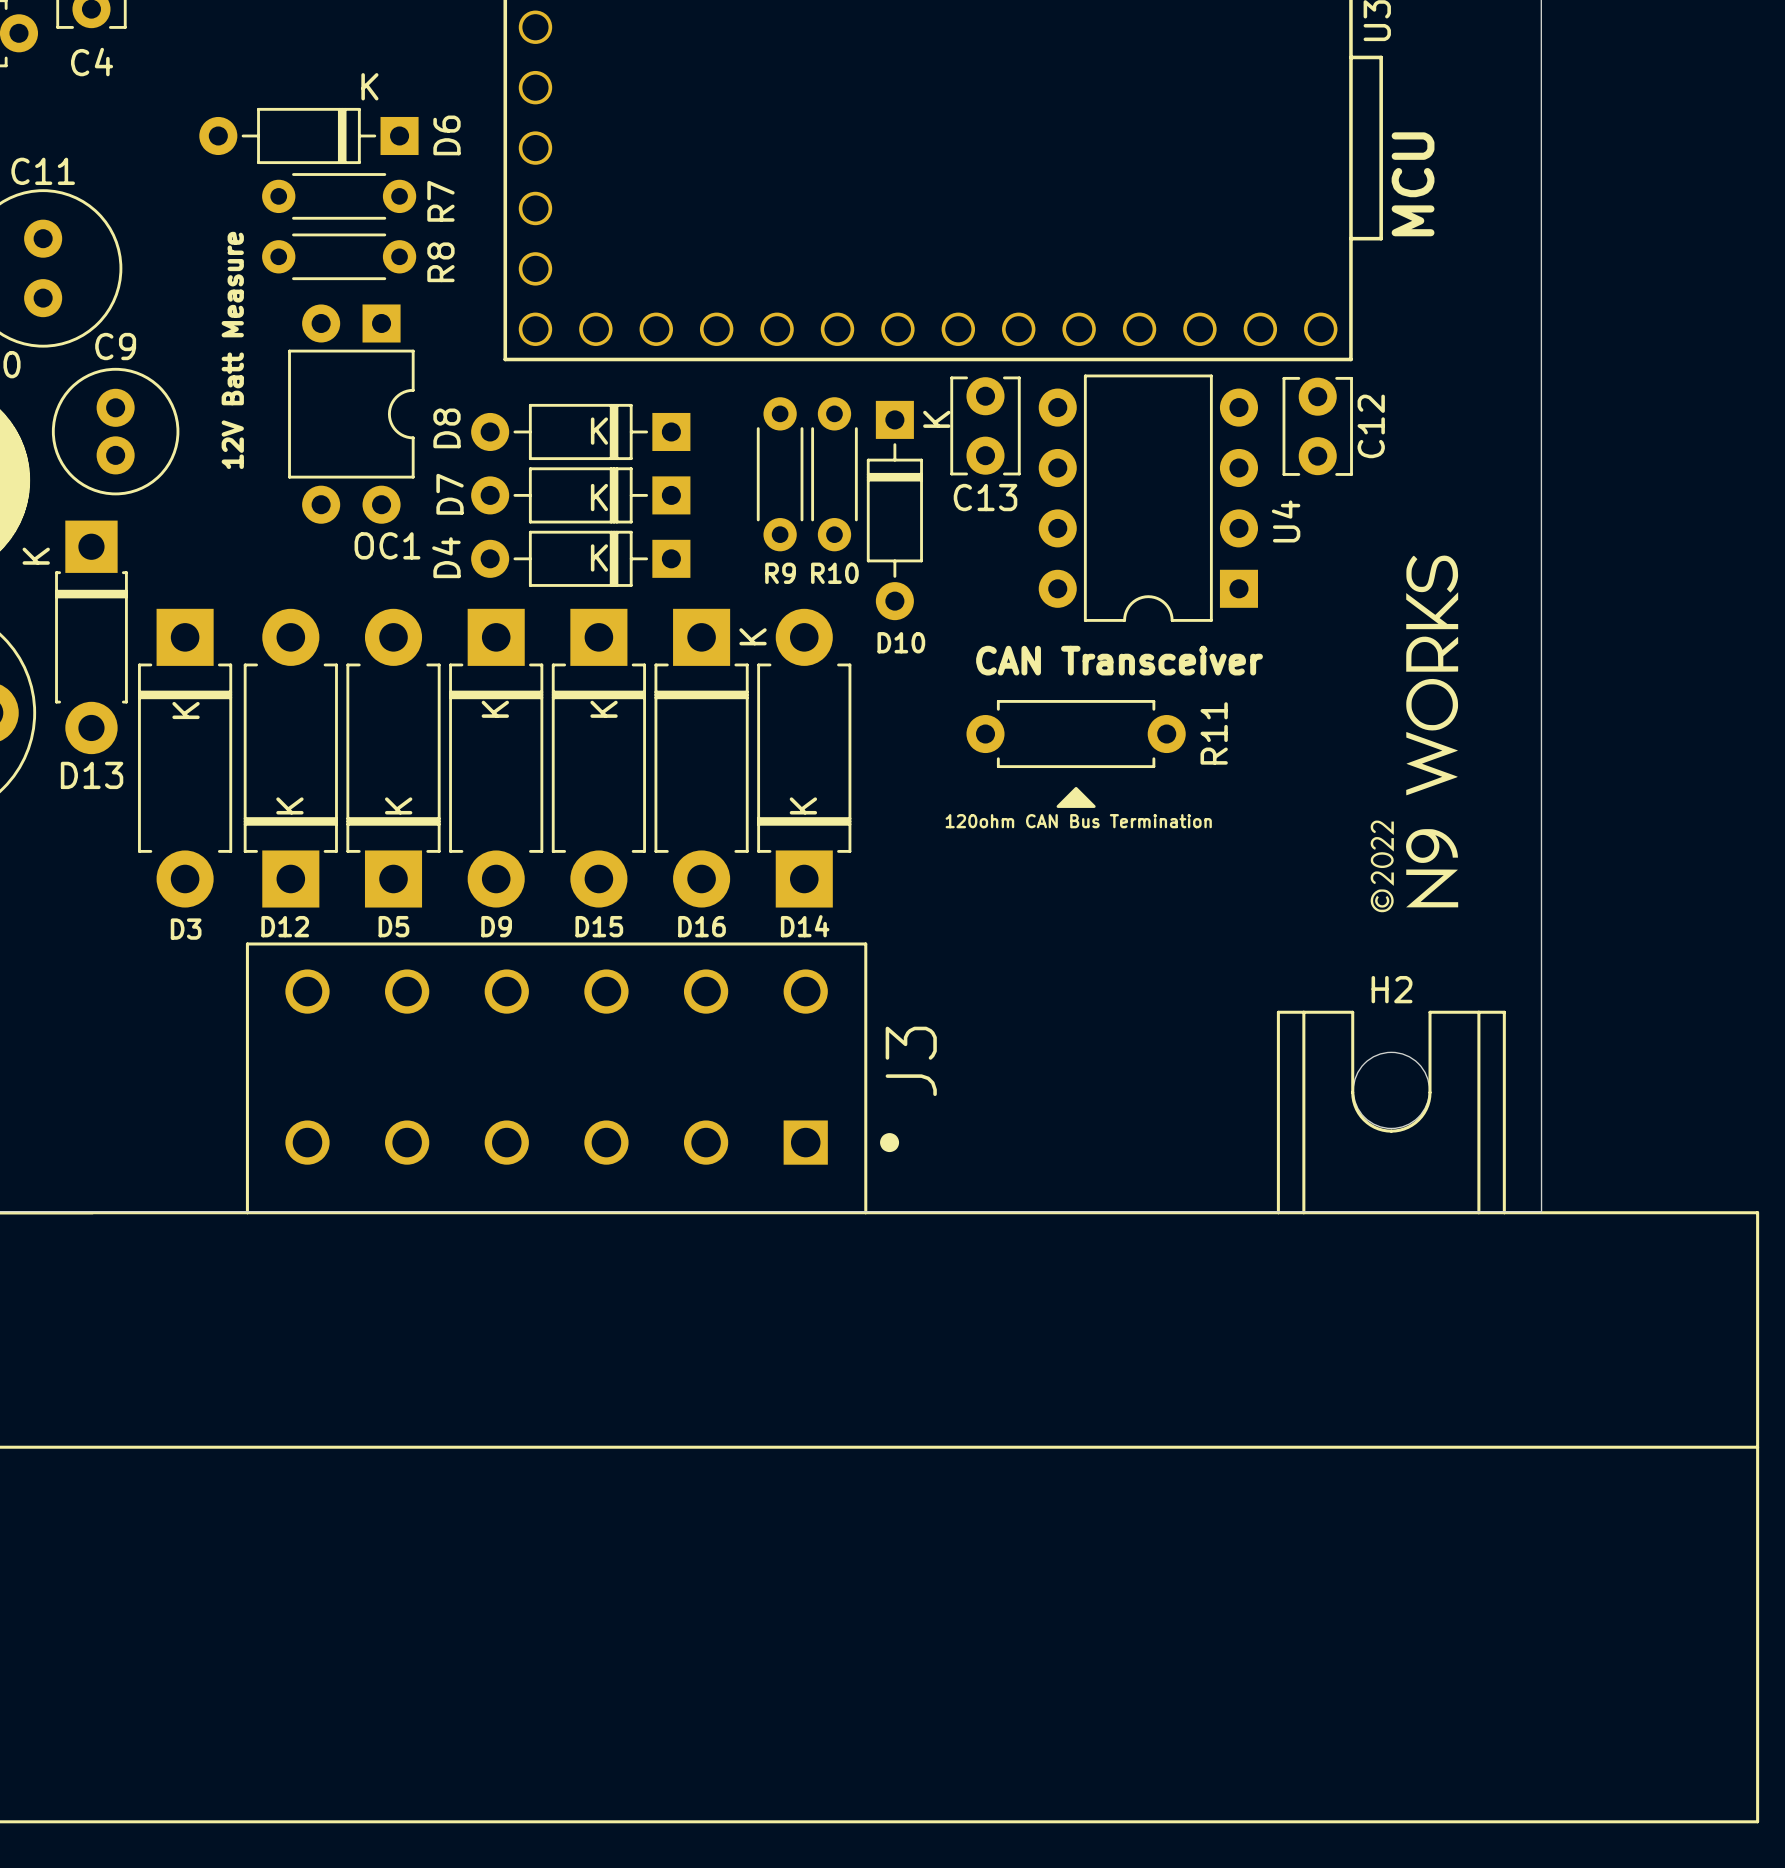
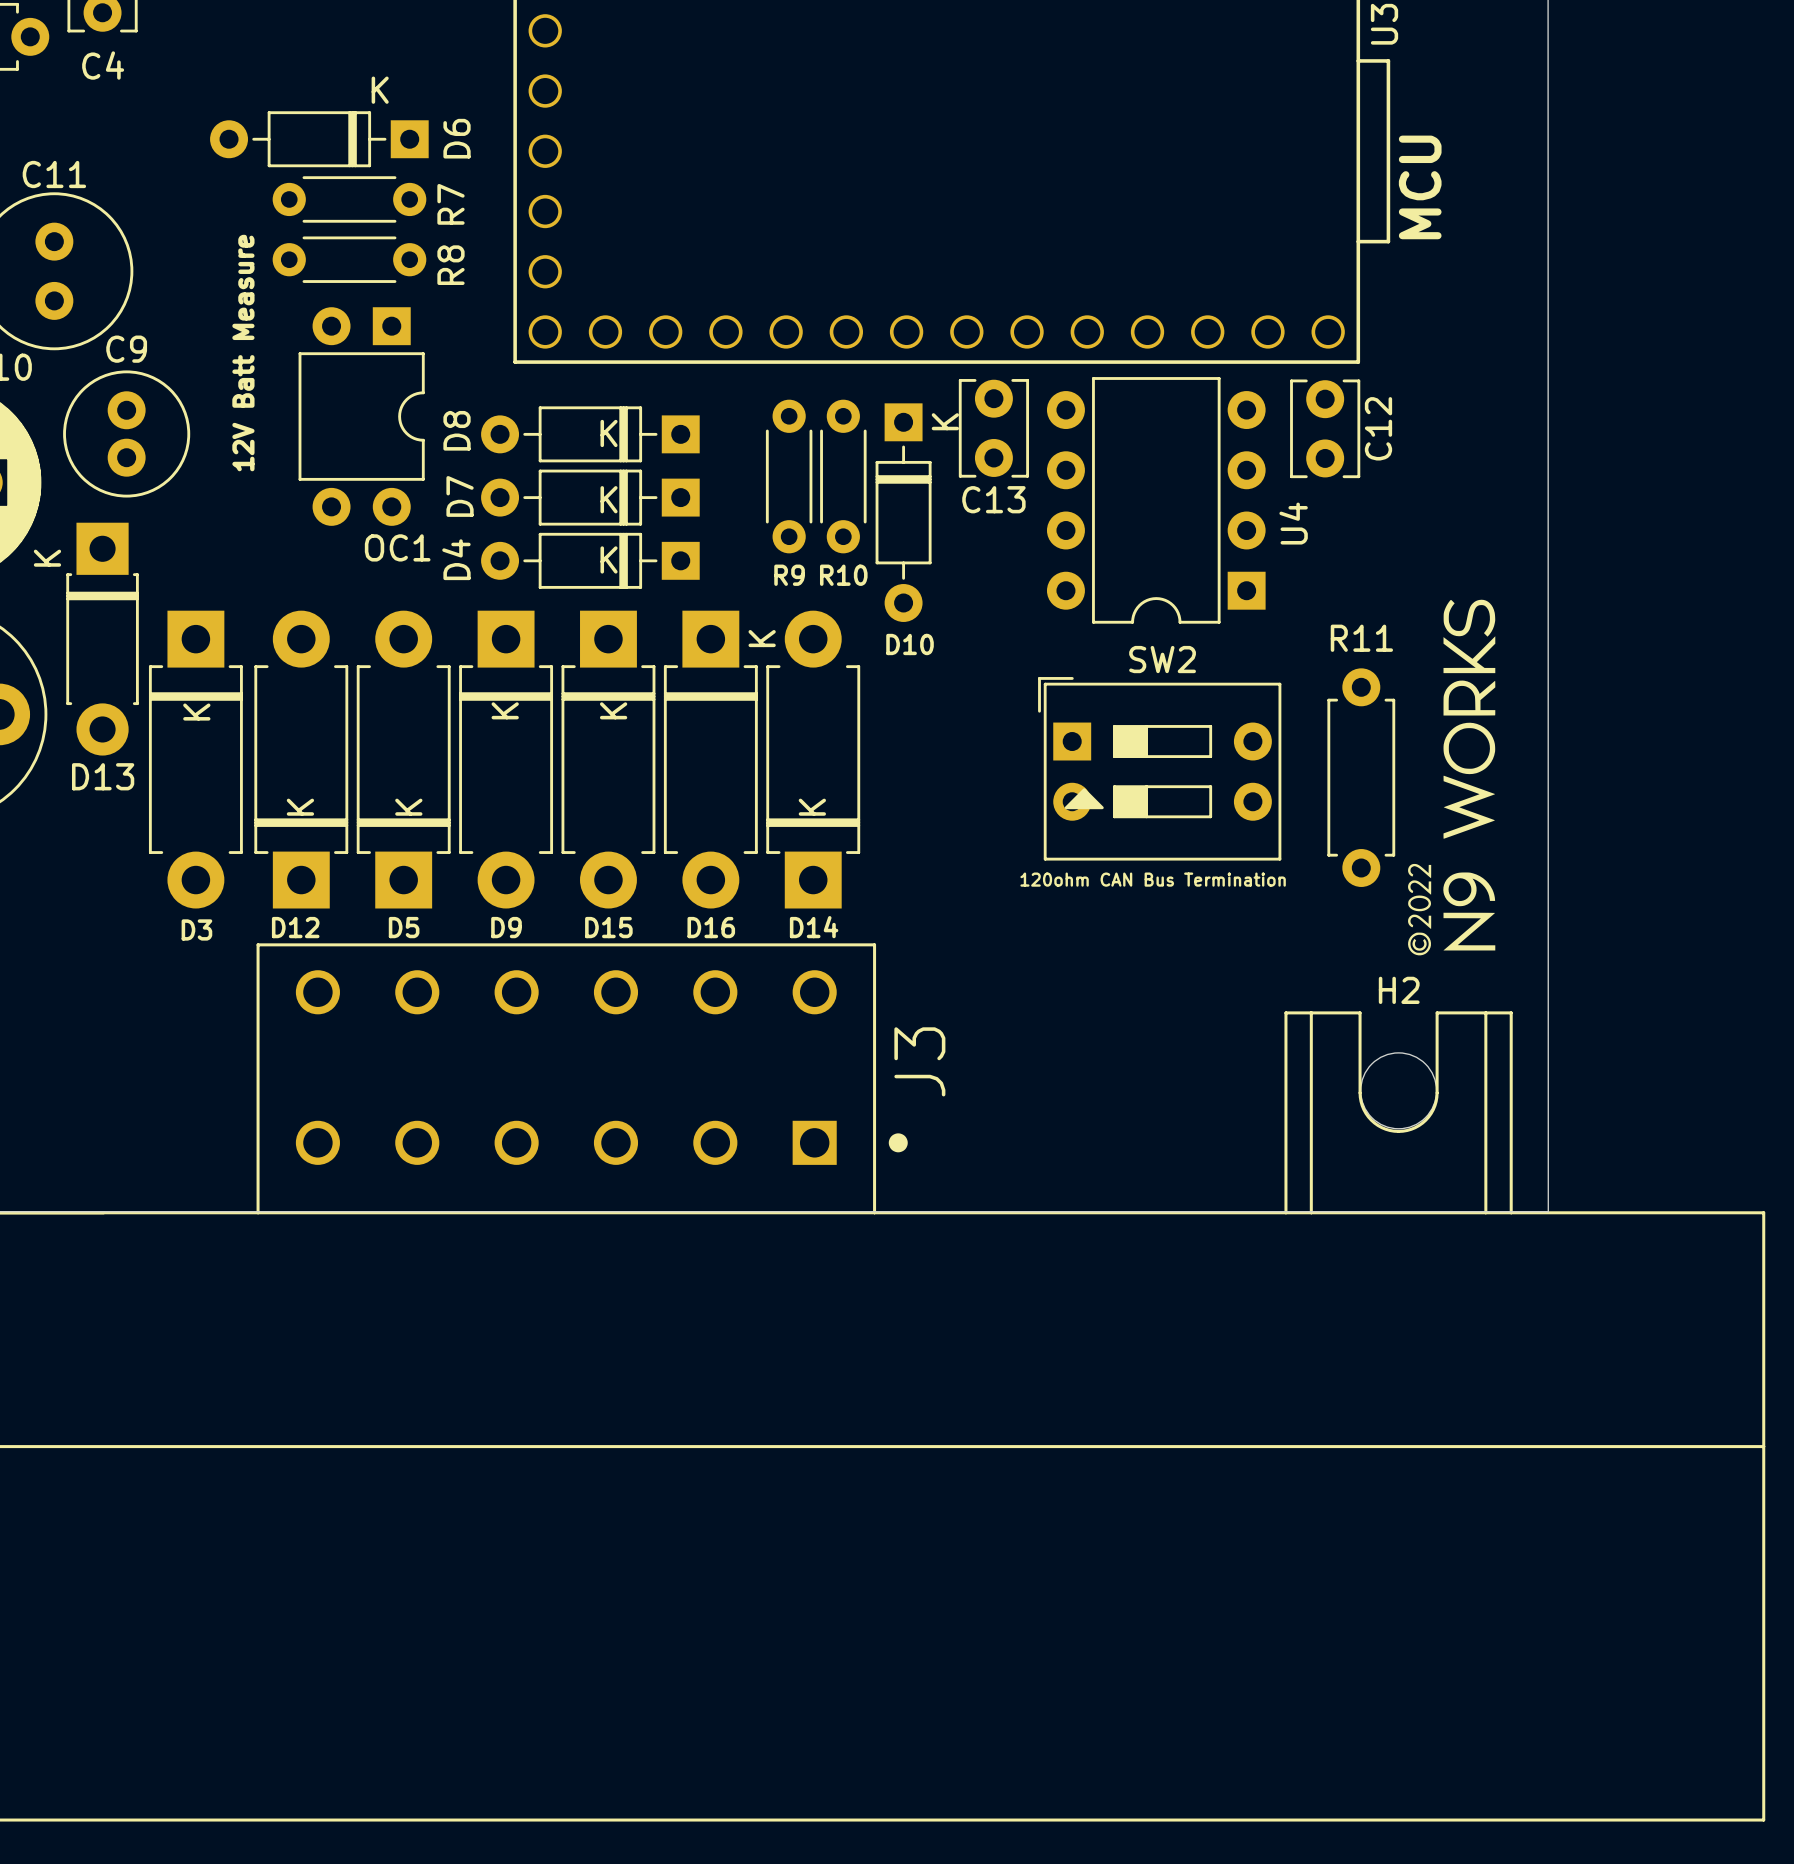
text: CAN Transceiver (1119, 660) -> none
R11 name position: R11 (1214, 733) -> R11 (1361, 638)
drawing position: (1414, 733) -> (1451, 777)
R11 rotation: 0° (1076, 734) -> 90° clockwise (1361, 777)
R11 position: (1076, 734) -> (1361, 777)
SW2: none -> (1159, 768)
text position: 120ohm CAN Bus Termination (1078, 821) -> 120ohm CAN Bus Termination (1153, 879)

